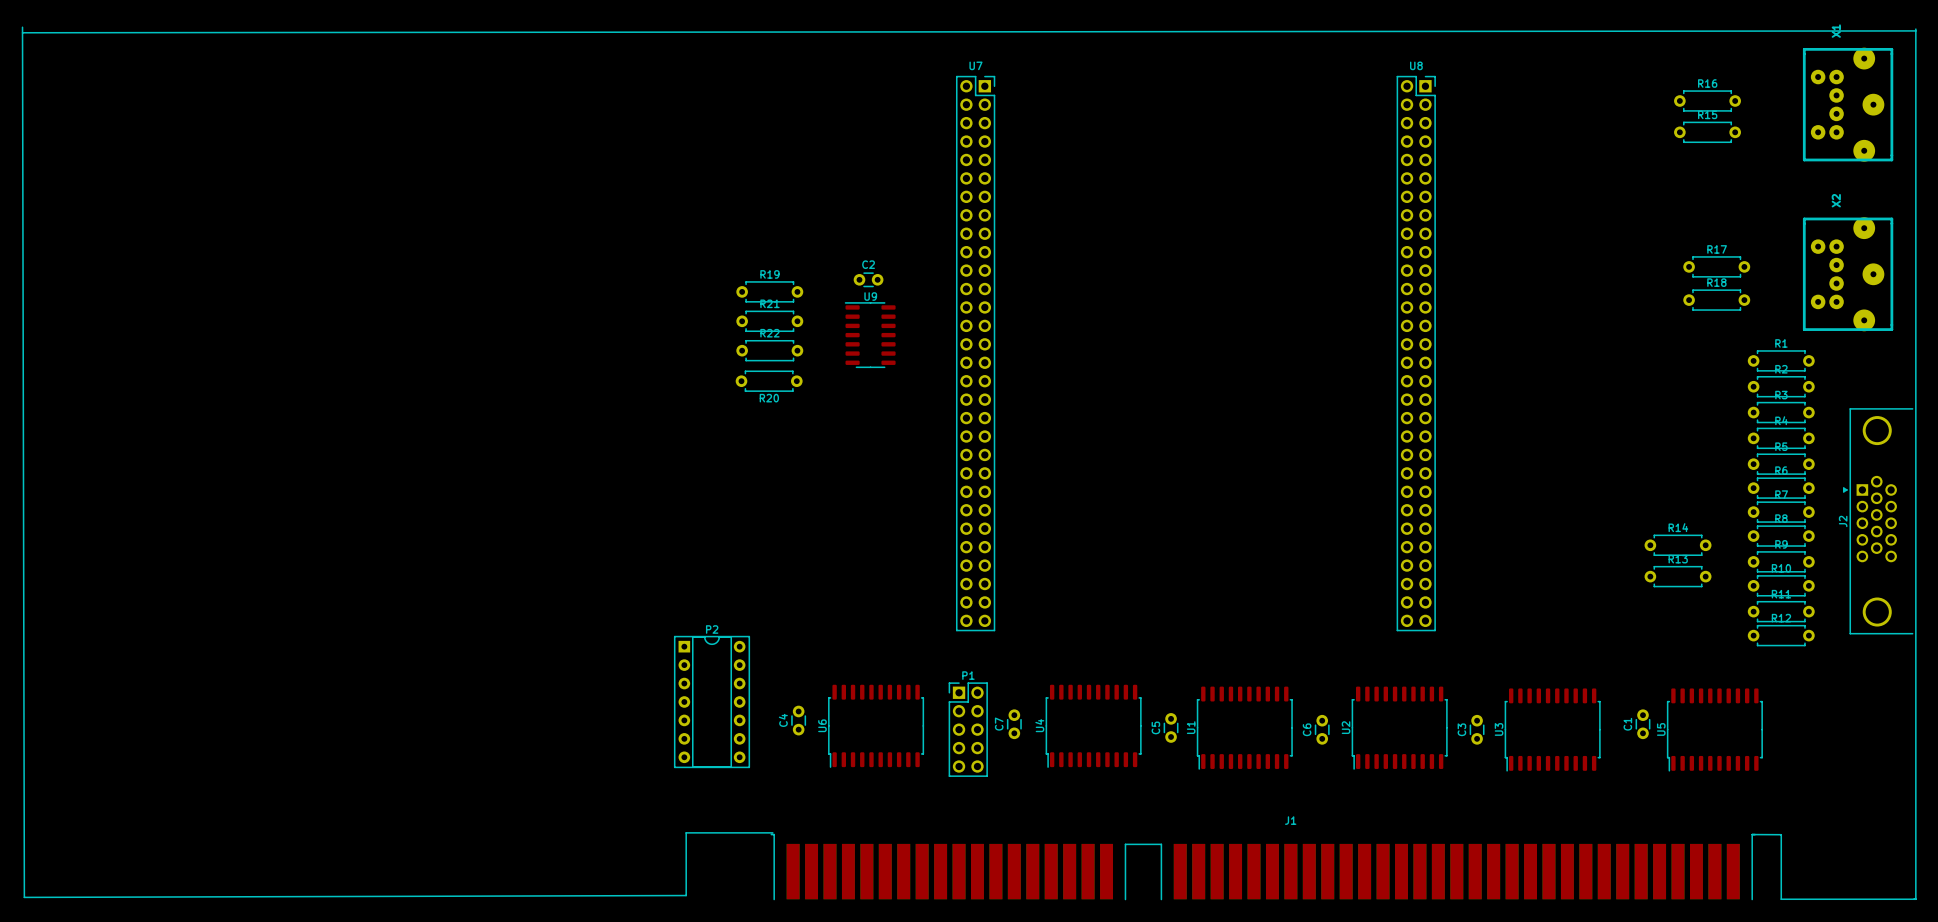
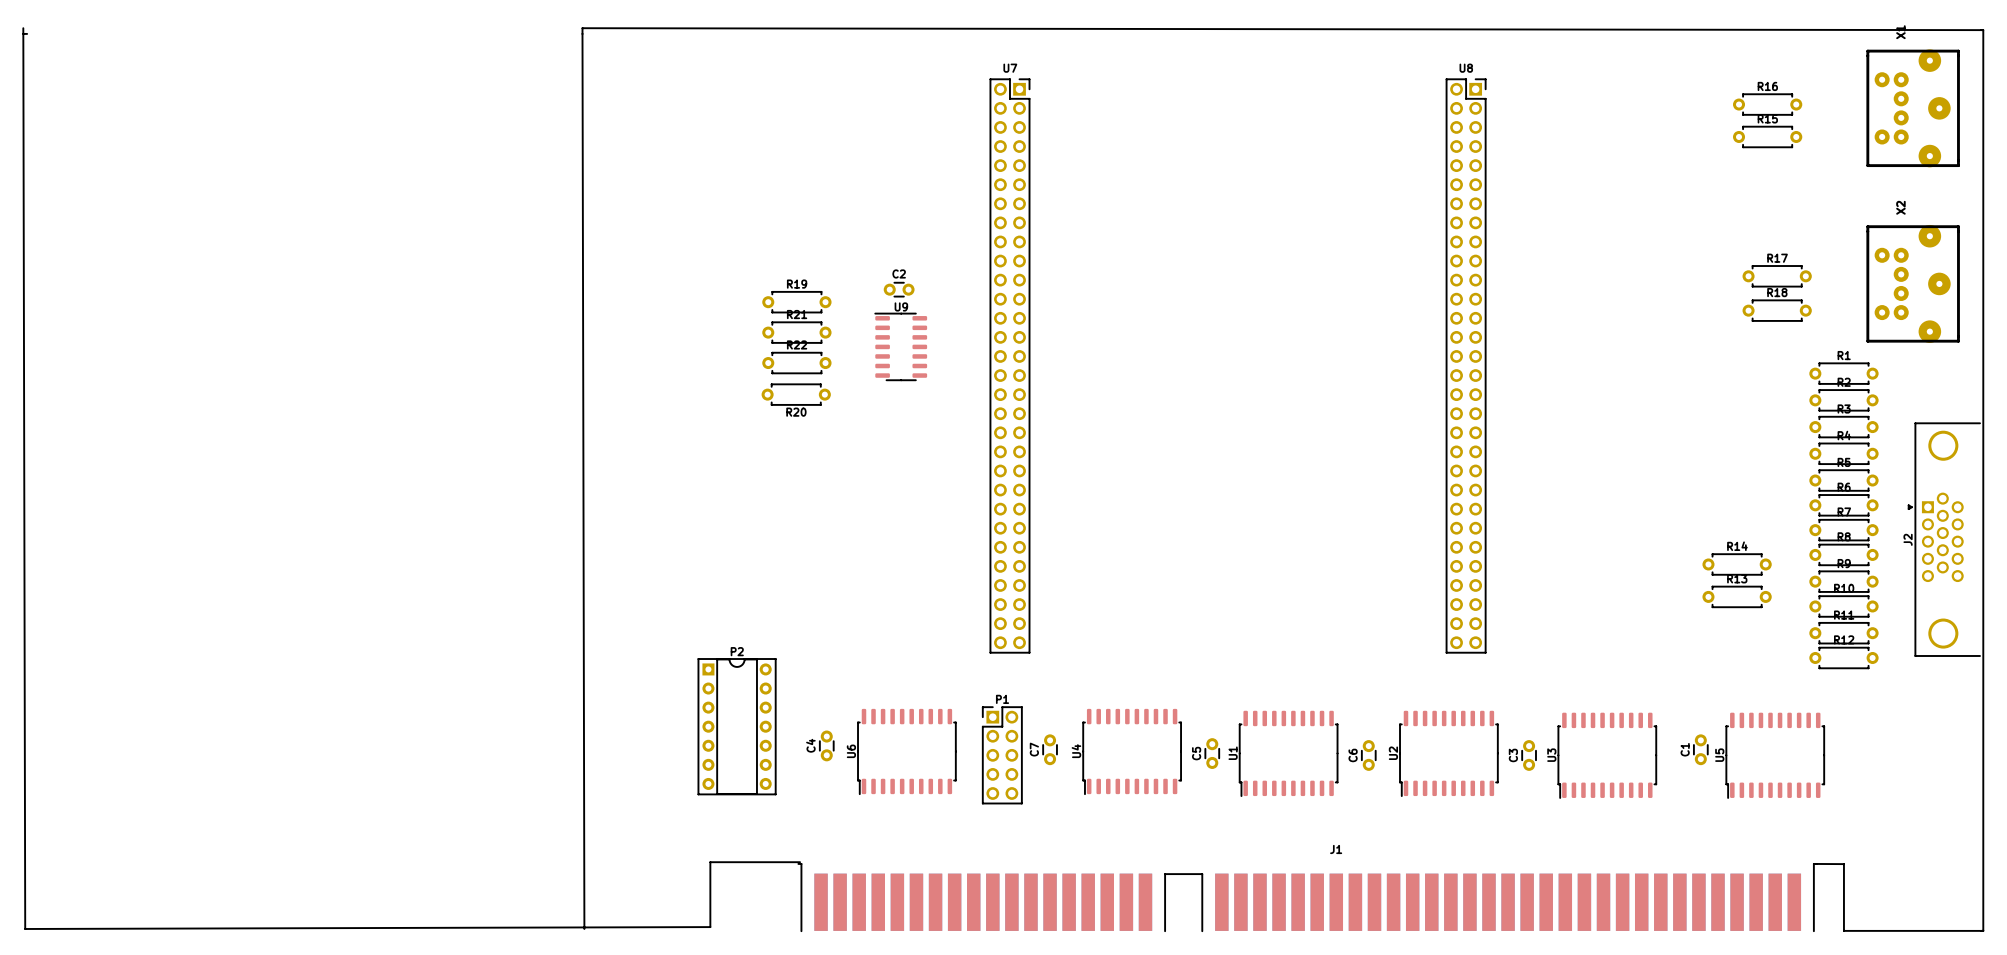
line: none -> (1983, 30) (582, 28) (584, 928)
line: (1915, 30) (22, 32) -> (27, 33) (23, 33)

